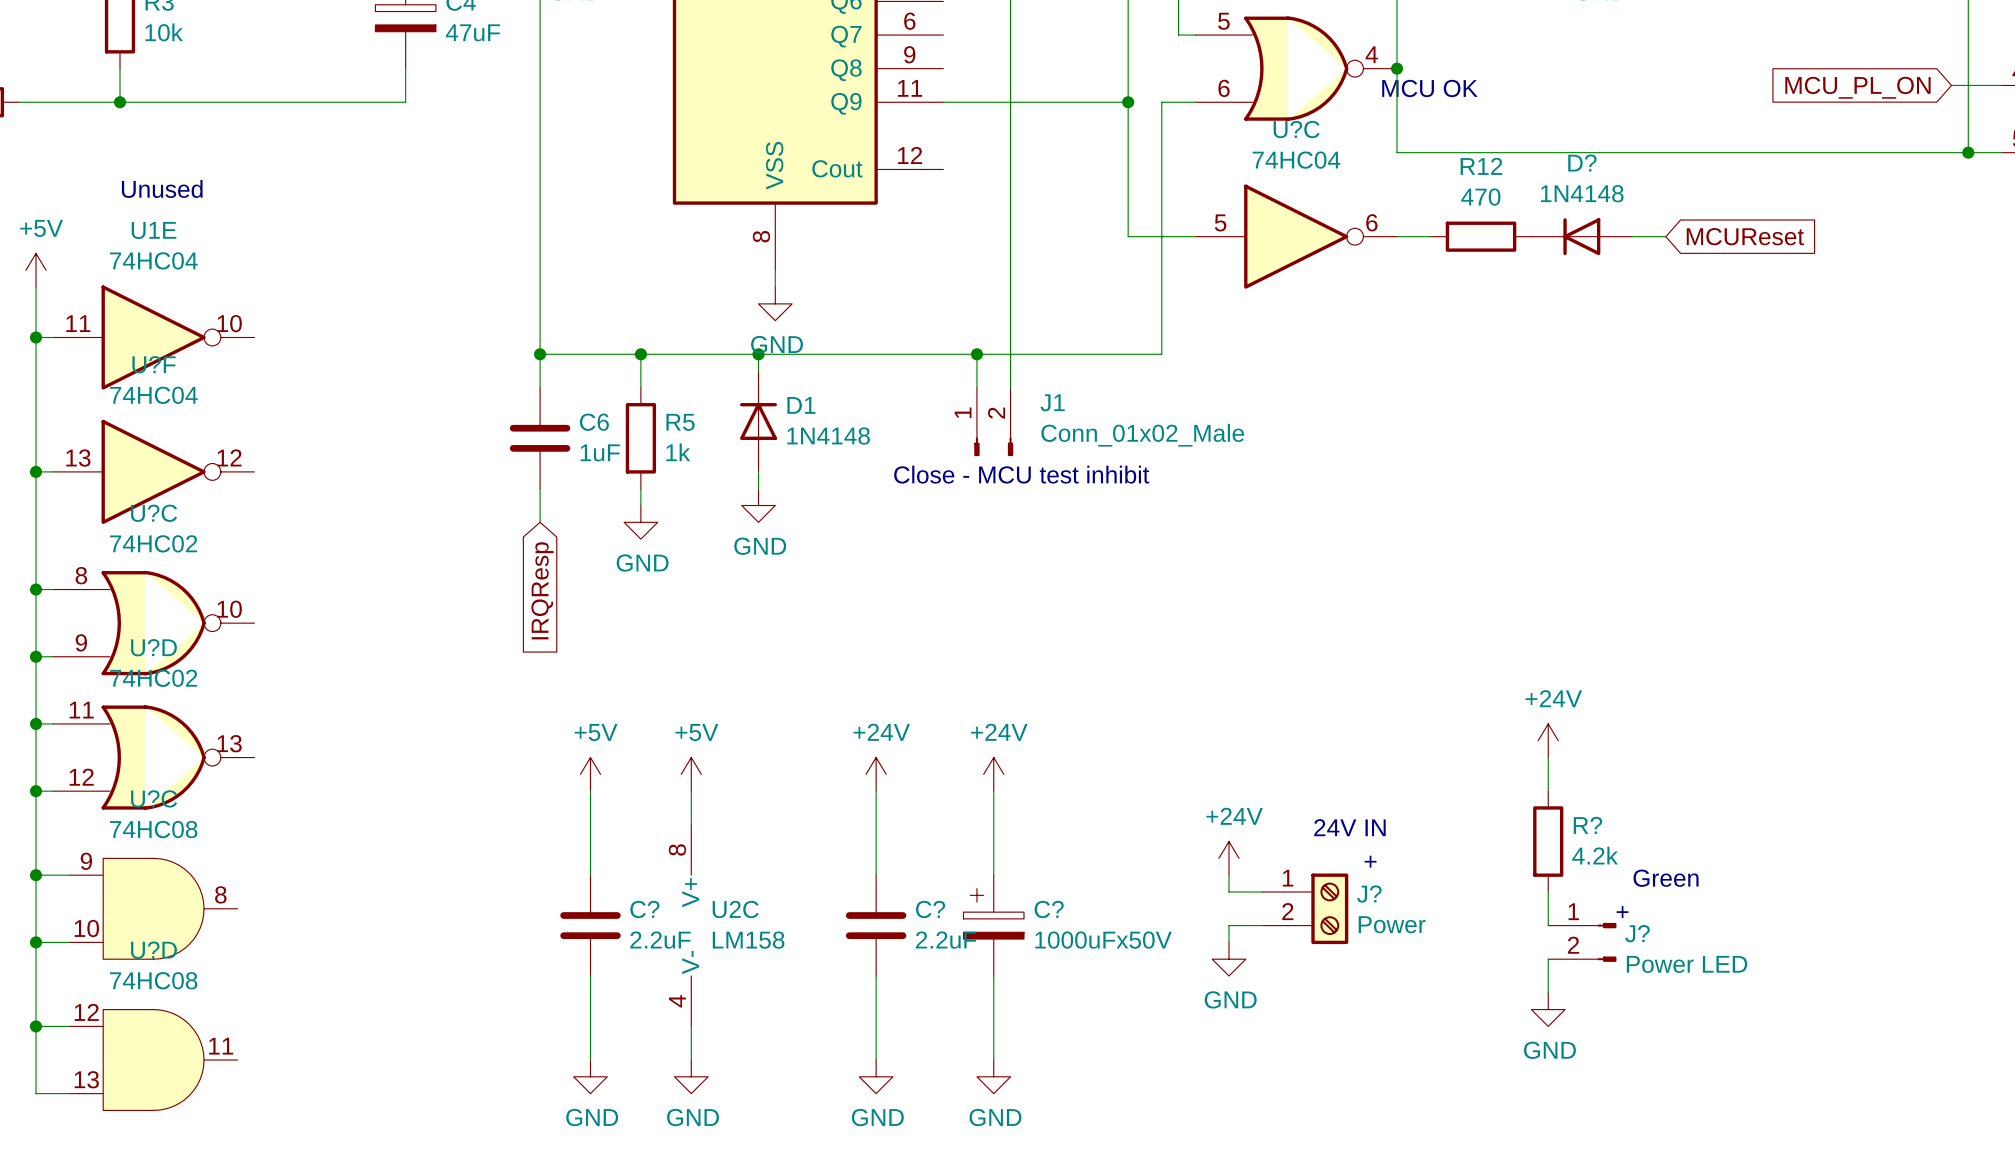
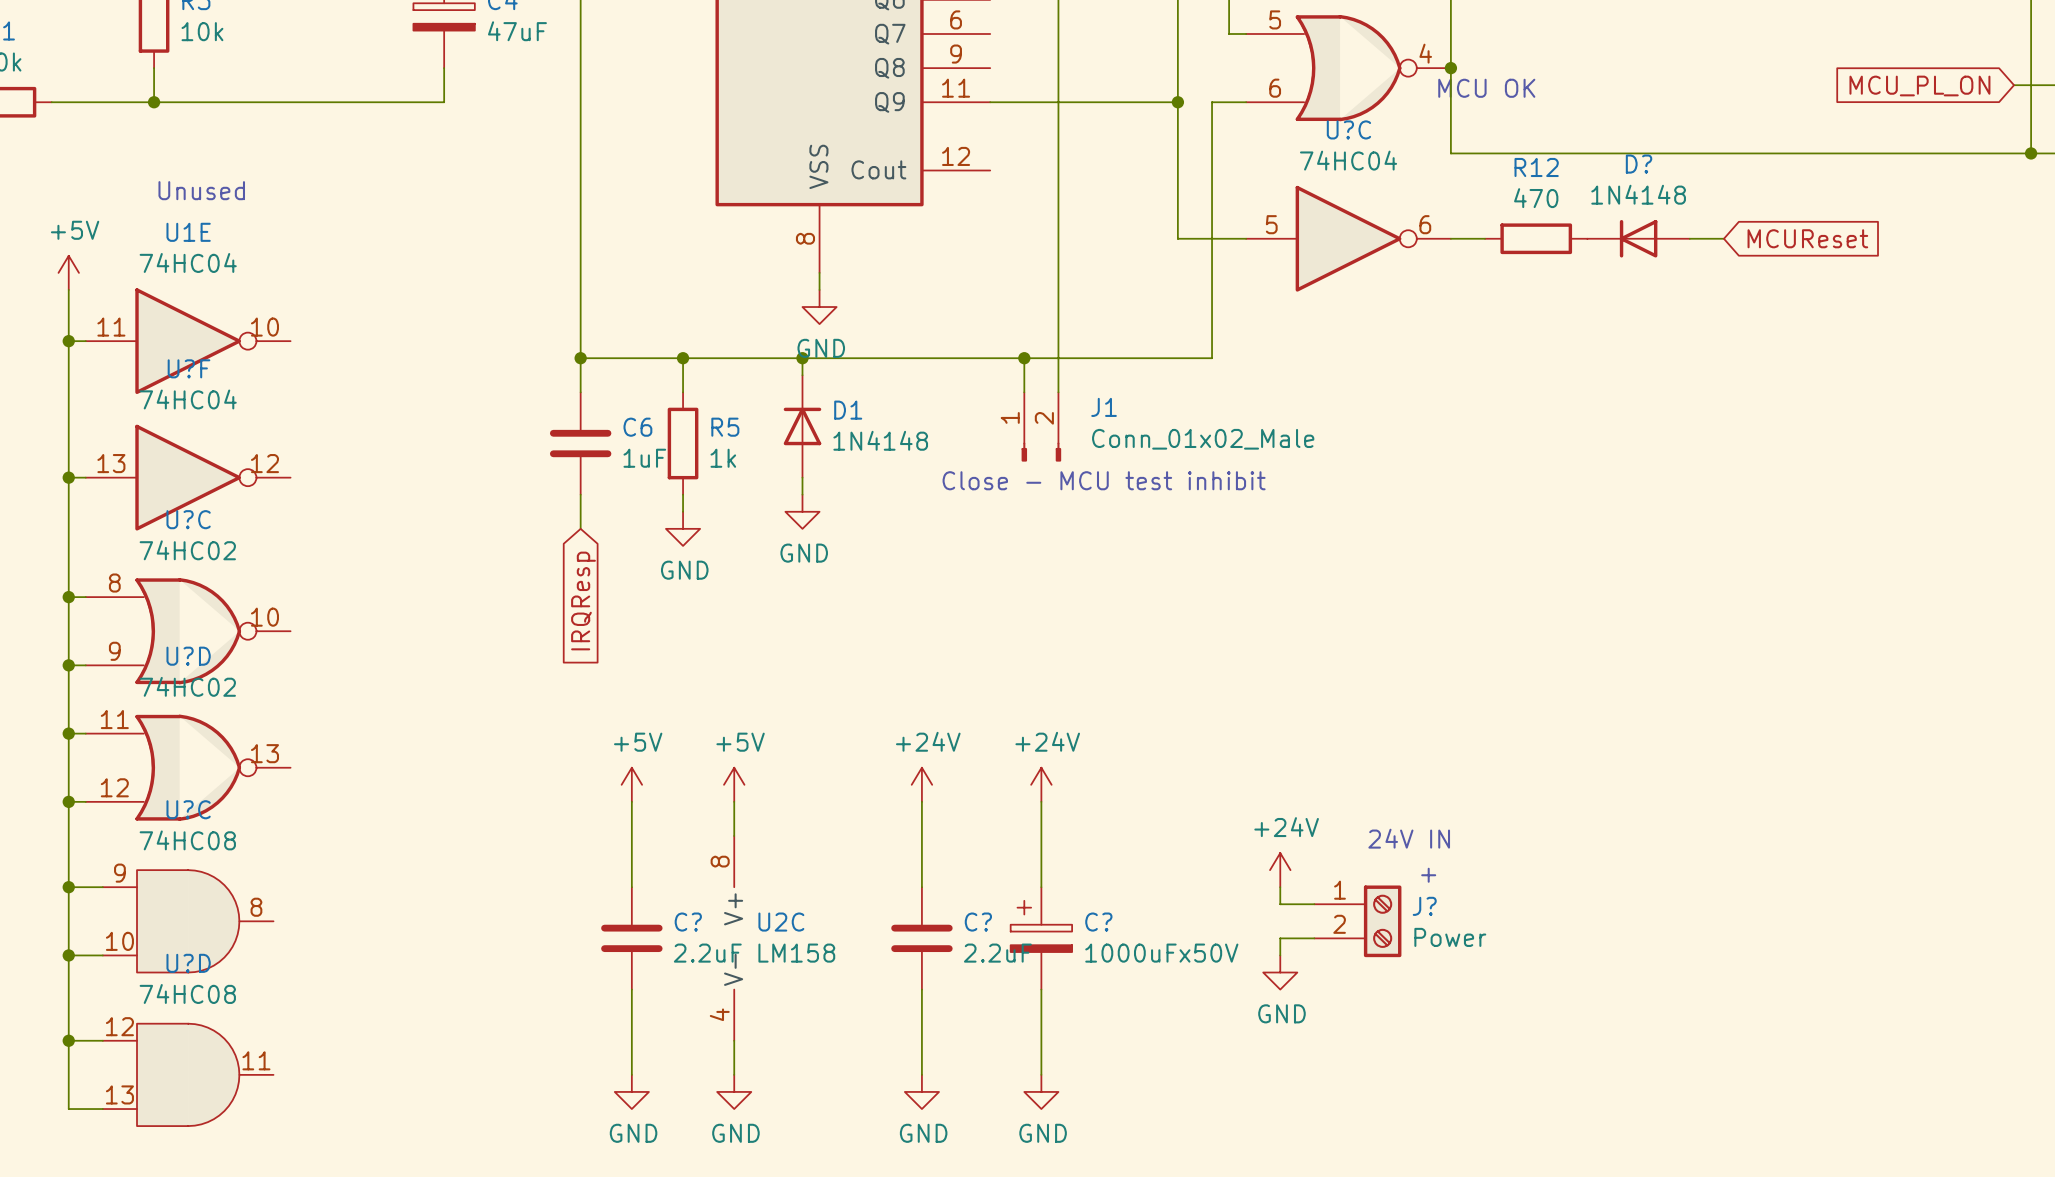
power symbol: +24V (1548, 740) -> none
wire: (1548, 757) (1548, 791) -> none
R?: 4.2k (1548, 841) -> none
text: Green (1666, 878) -> none
wire: (1548, 891) (1548, 925) -> none
text: + (1622, 912) -> none
J?: Power LED (1582, 942) -> none
wire: (1548, 959) (1548, 992) -> none
power symbol: GND (1548, 1009) -> none

